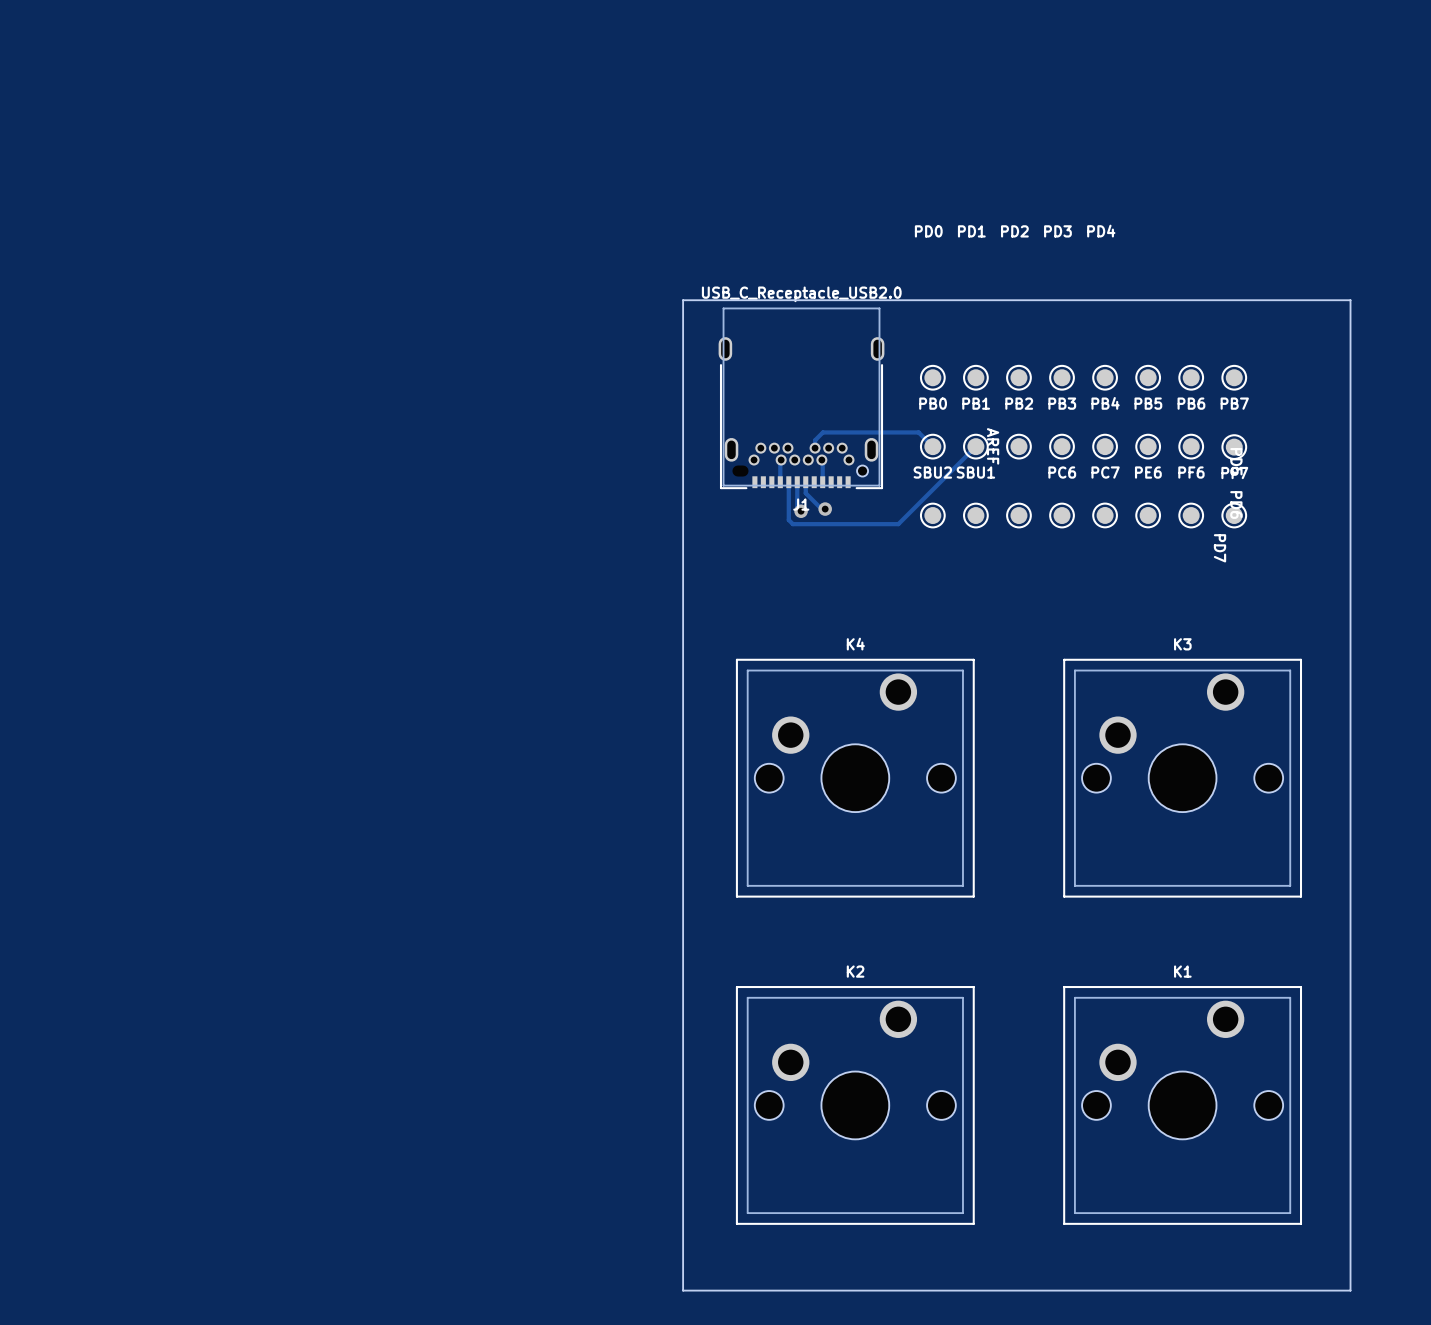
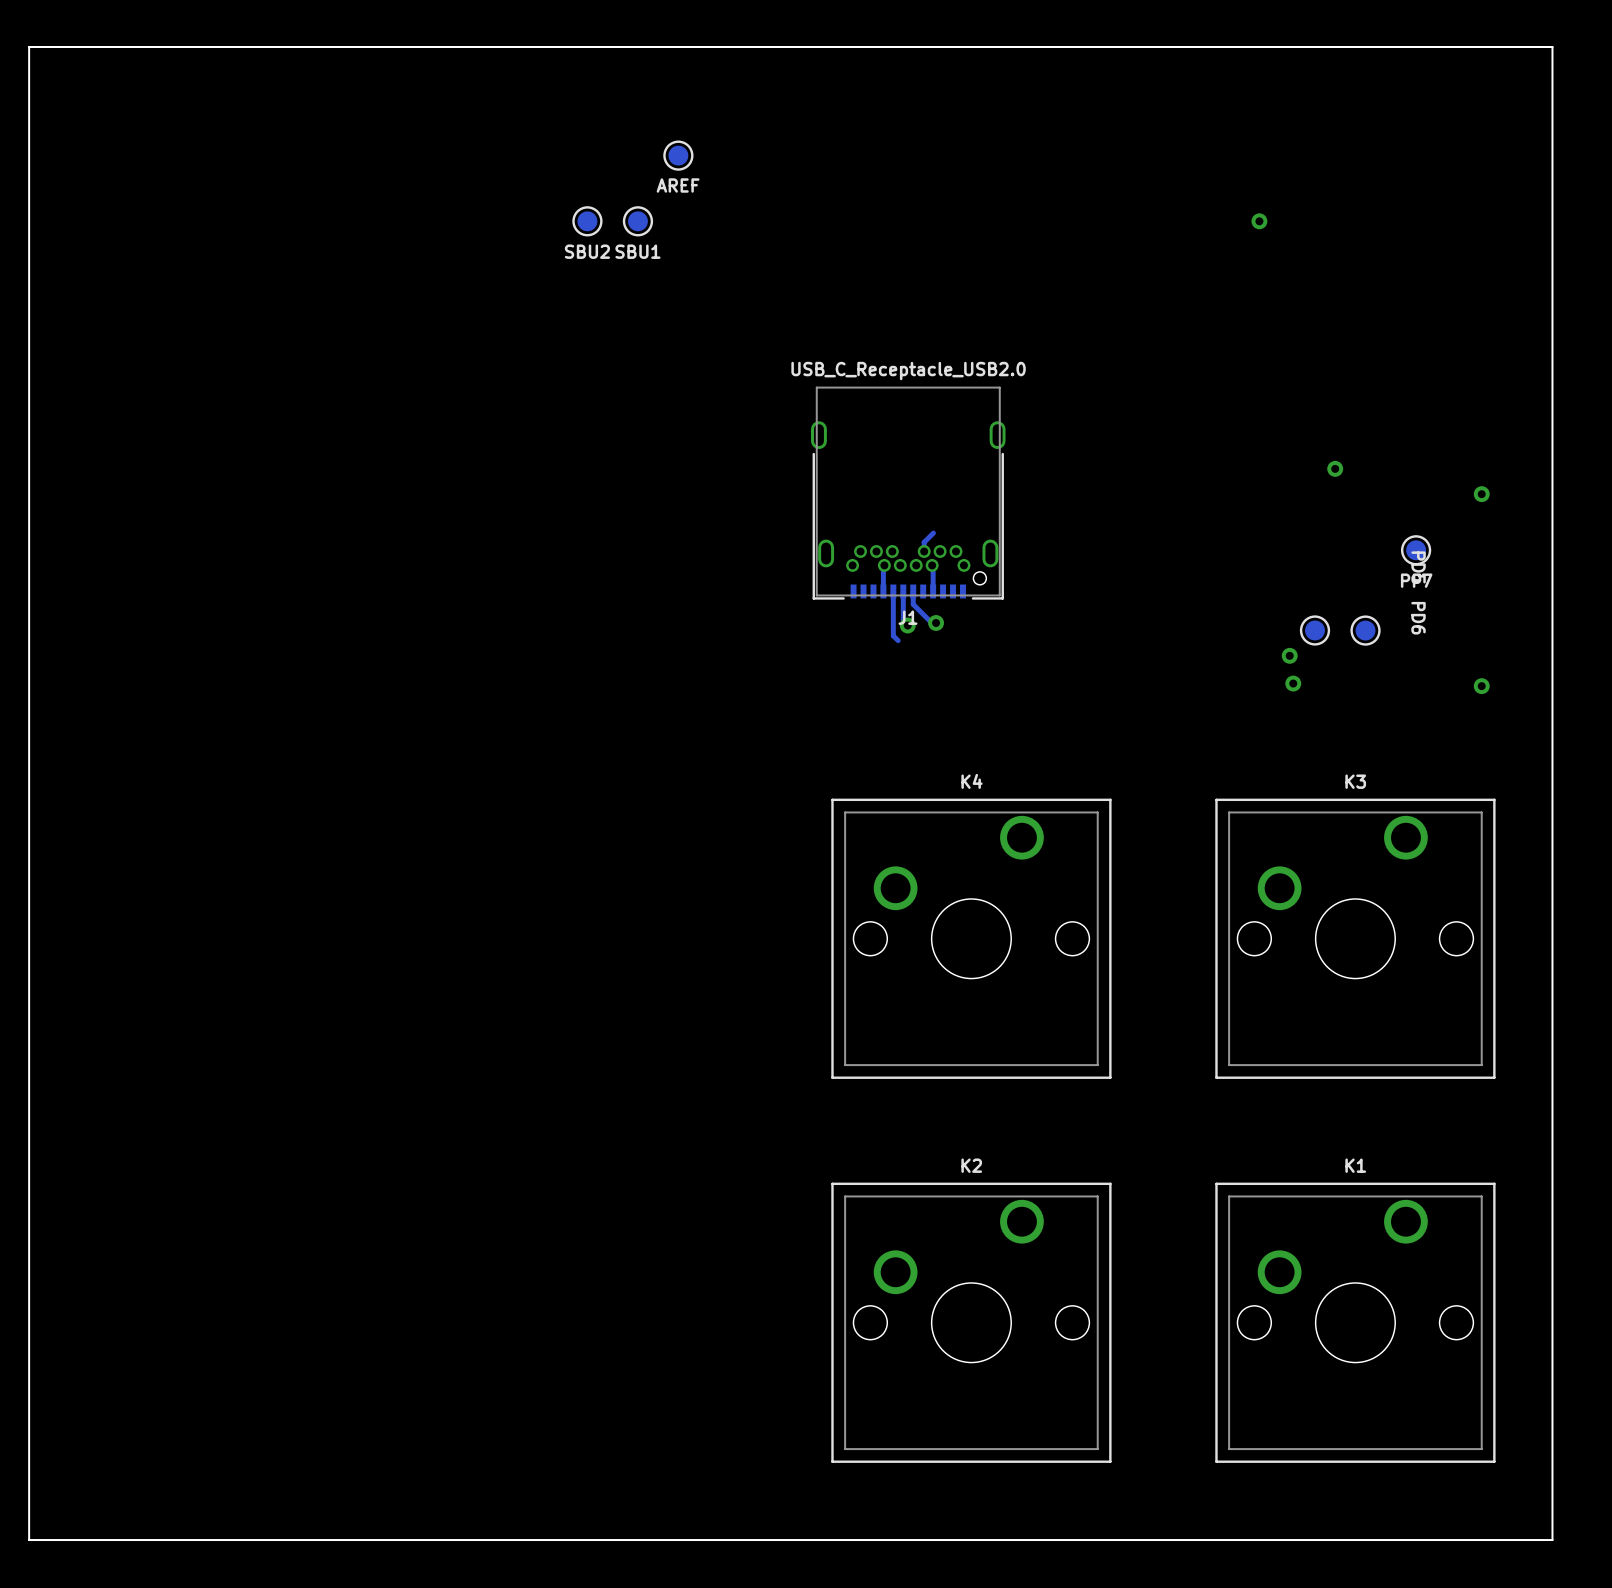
part: none -> AREF (678, 155)
part: none -> SBU2 (587, 221)
part: none -> SBU1 (637, 221)
via: none -> (1259, 221)
board edge: (1350, 300) (683, 300) (683, 1290) -> (1552, 377) (1552, 46) (29, 46) (29, 1540) (769, 1540)
part: PB0 (932, 377) -> none
part: PB1 (975, 377) -> none
part: PB2 (1018, 377) -> none
part: PB3 (1062, 377) -> none
part: PB4 (1105, 377) -> none
part: PB5 (1148, 377) -> none
via: none -> (1335, 468)
part: PB6 (1191, 377) -> none
part: PB7 (1234, 377) -> none
via: none -> (1481, 494)
track: (822, 432) (918, 432) (932, 446) -> none
part: SBU2 (932, 446) -> none
track: (975, 446) (898, 524) (792, 524) -> none
part: SBU1 (975, 446) -> none
part: AREF (1018, 446) -> none
part: PC6 (1062, 446) -> none
part: PC7 (1105, 446) -> none
part: PE6 (1148, 446) -> none
part: PF6 (1191, 446) -> none
part: PD0 (932, 515) -> none
part: PD1 (975, 515) -> none
part: PD2 (1018, 515) -> none
part: PD3 (1062, 515) -> none
part: PD4 (1105, 515) -> none
part: PD7 (1234, 515) -> none
via: none -> (1289, 655)
via: none -> (1293, 683)
via: none -> (1481, 686)

